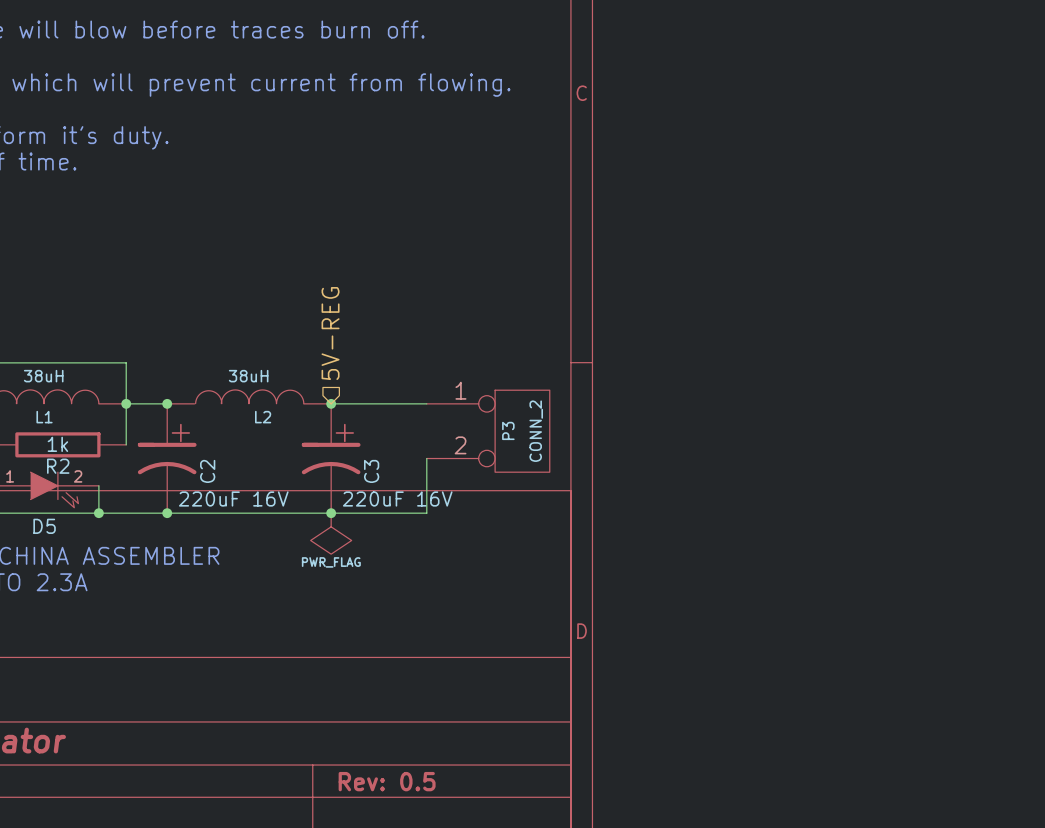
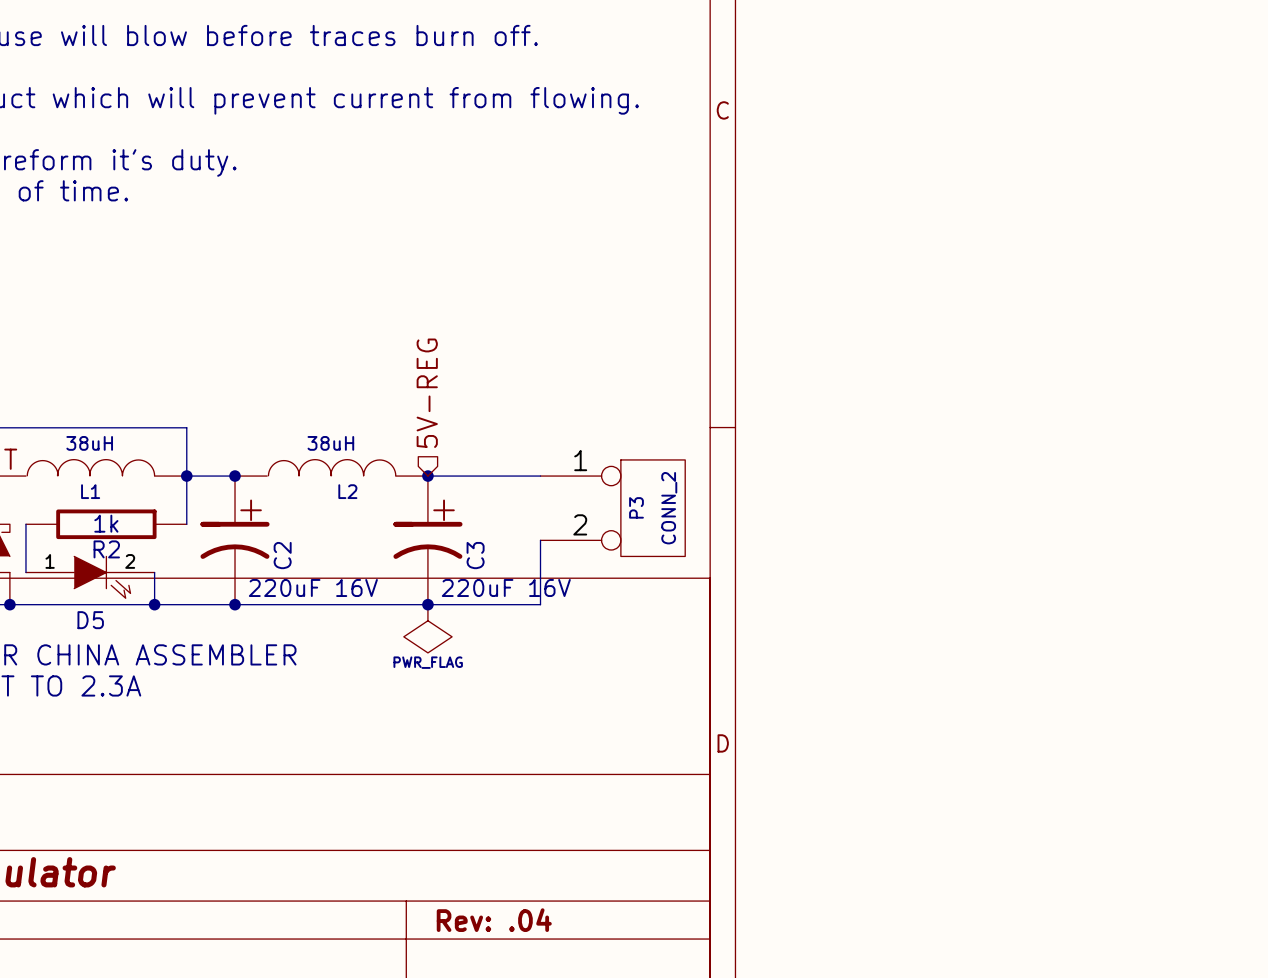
title block: Rev: 0.5 (387, 781) -> Rev: .04 (494, 920)

